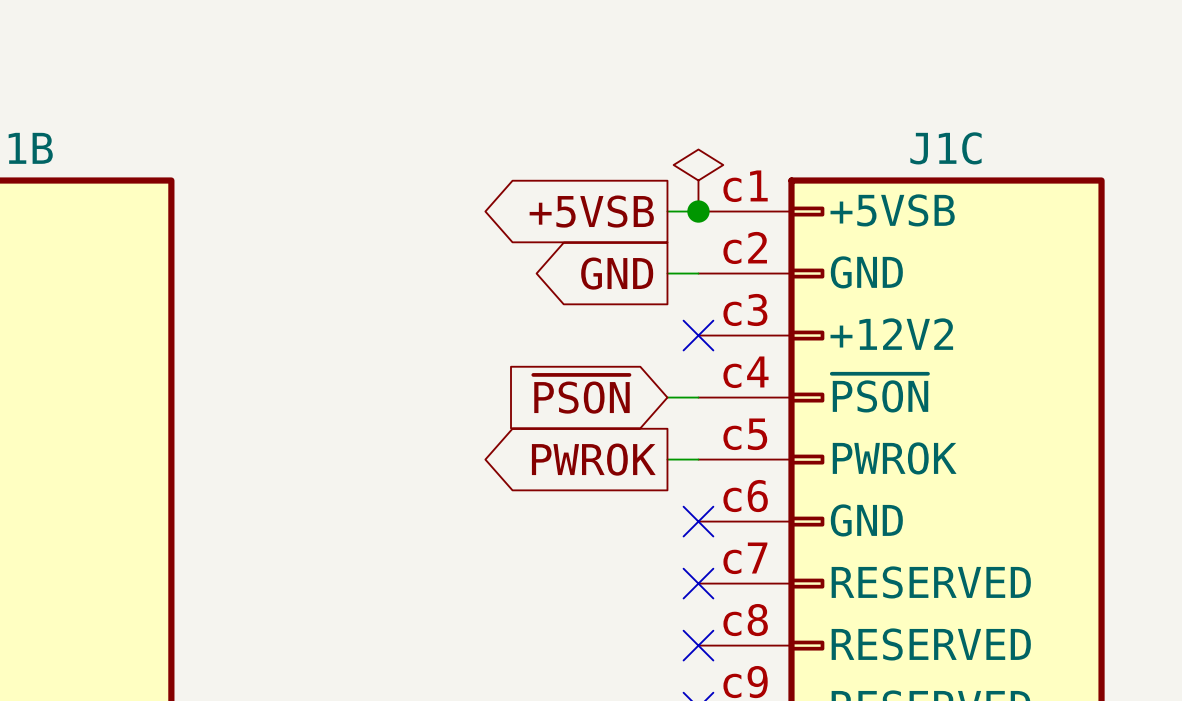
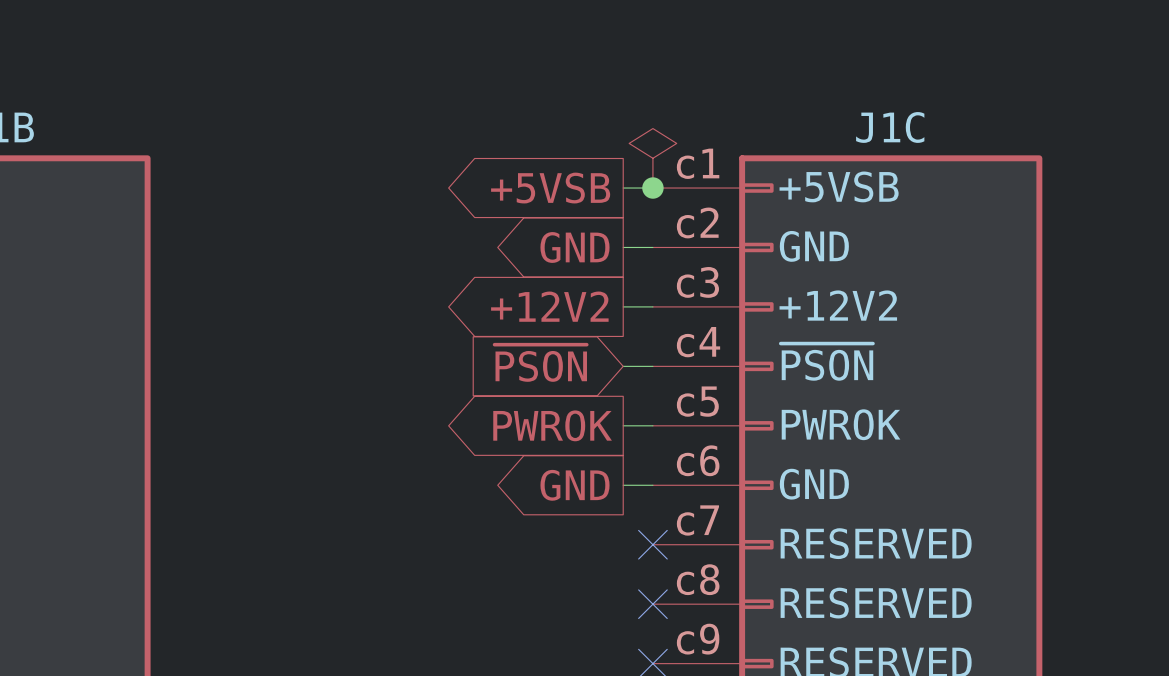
global label: none -> +12V2 (549, 306)
wire: none -> (623, 306) (652, 306)
no-connect mark: (698, 335) -> none
global label: none -> GND (575, 485)
wire: none -> (623, 485) (652, 485)
no-connect mark: (698, 521) -> none

